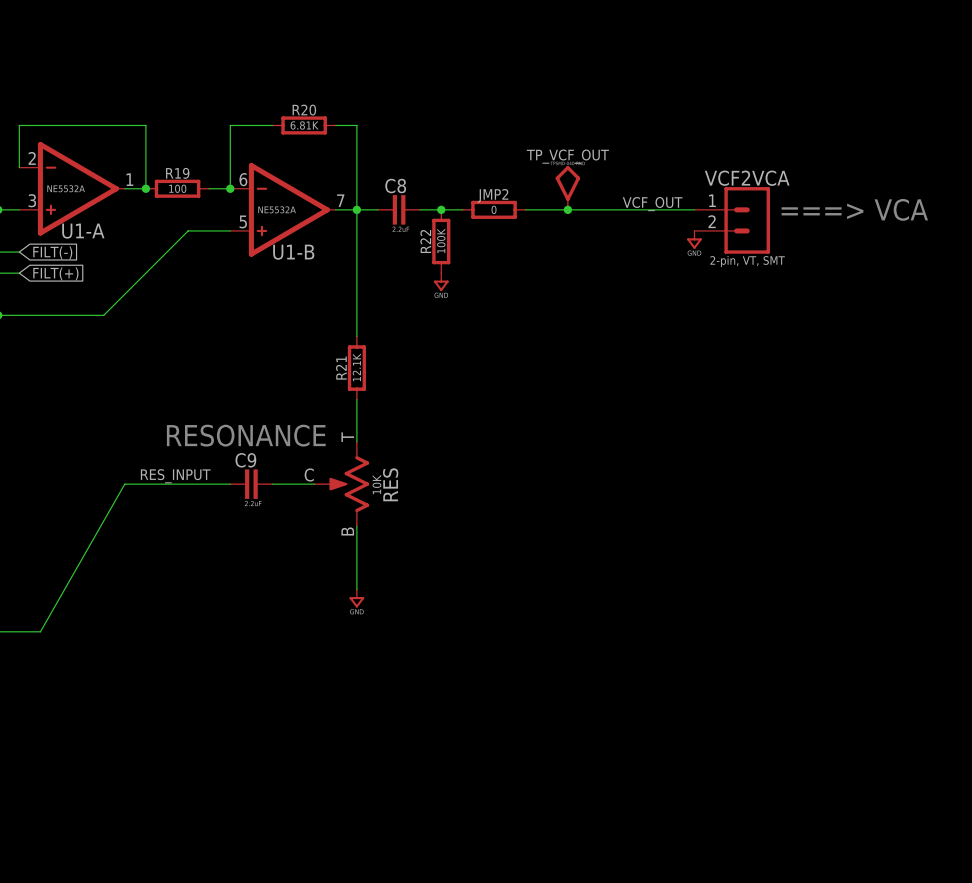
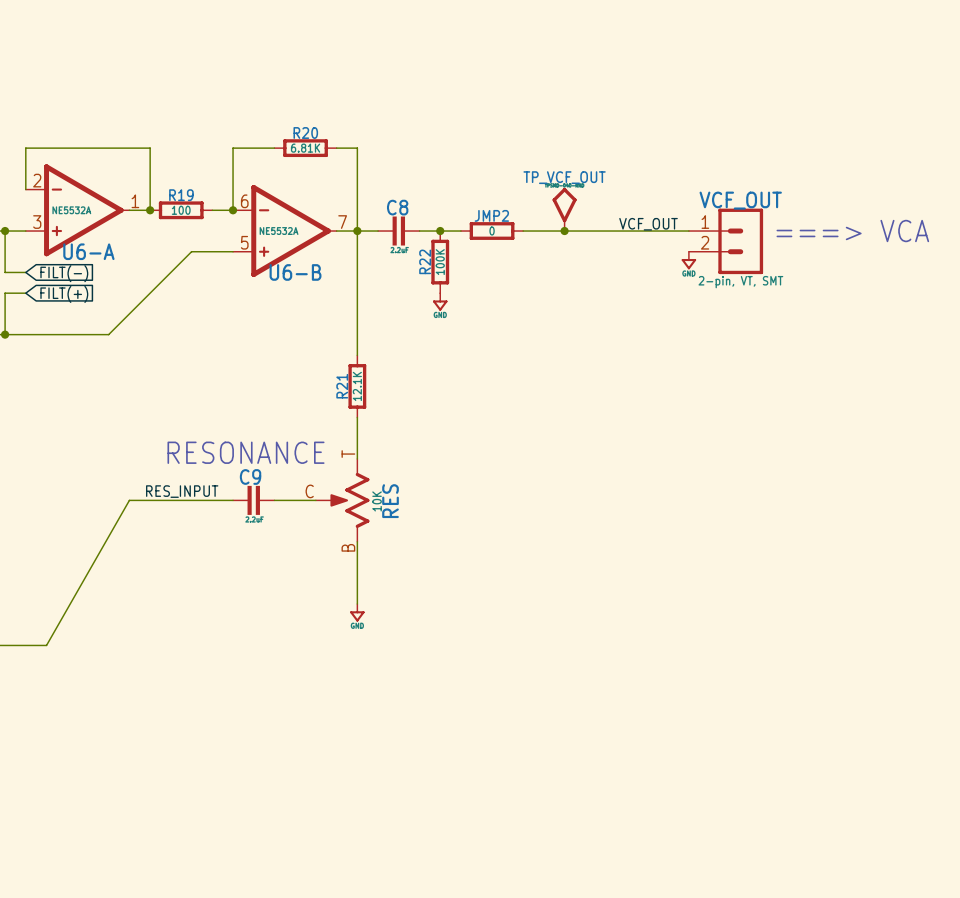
VCF2VCA name: VCF2VCA (747, 178) -> VCF_OUT (740, 200)
U1-A name: U1-A (83, 231) -> U6-A (88, 251)
U1-B name: U1-B (293, 252) -> U6-B (295, 272)

